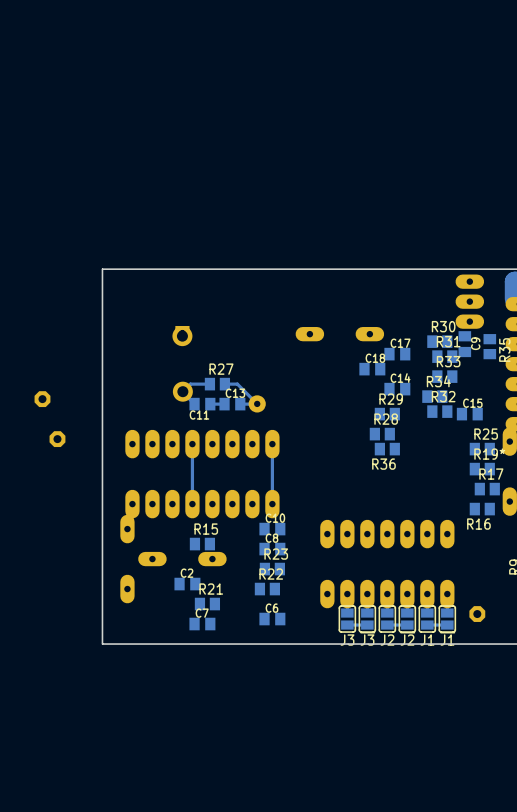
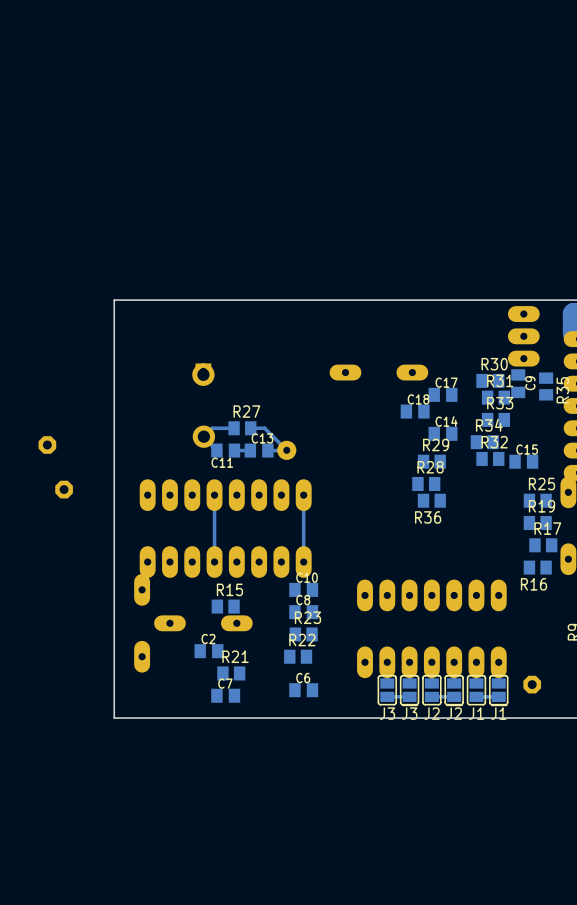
R19* name: R19* (489, 454) -> R19 (542, 506)

